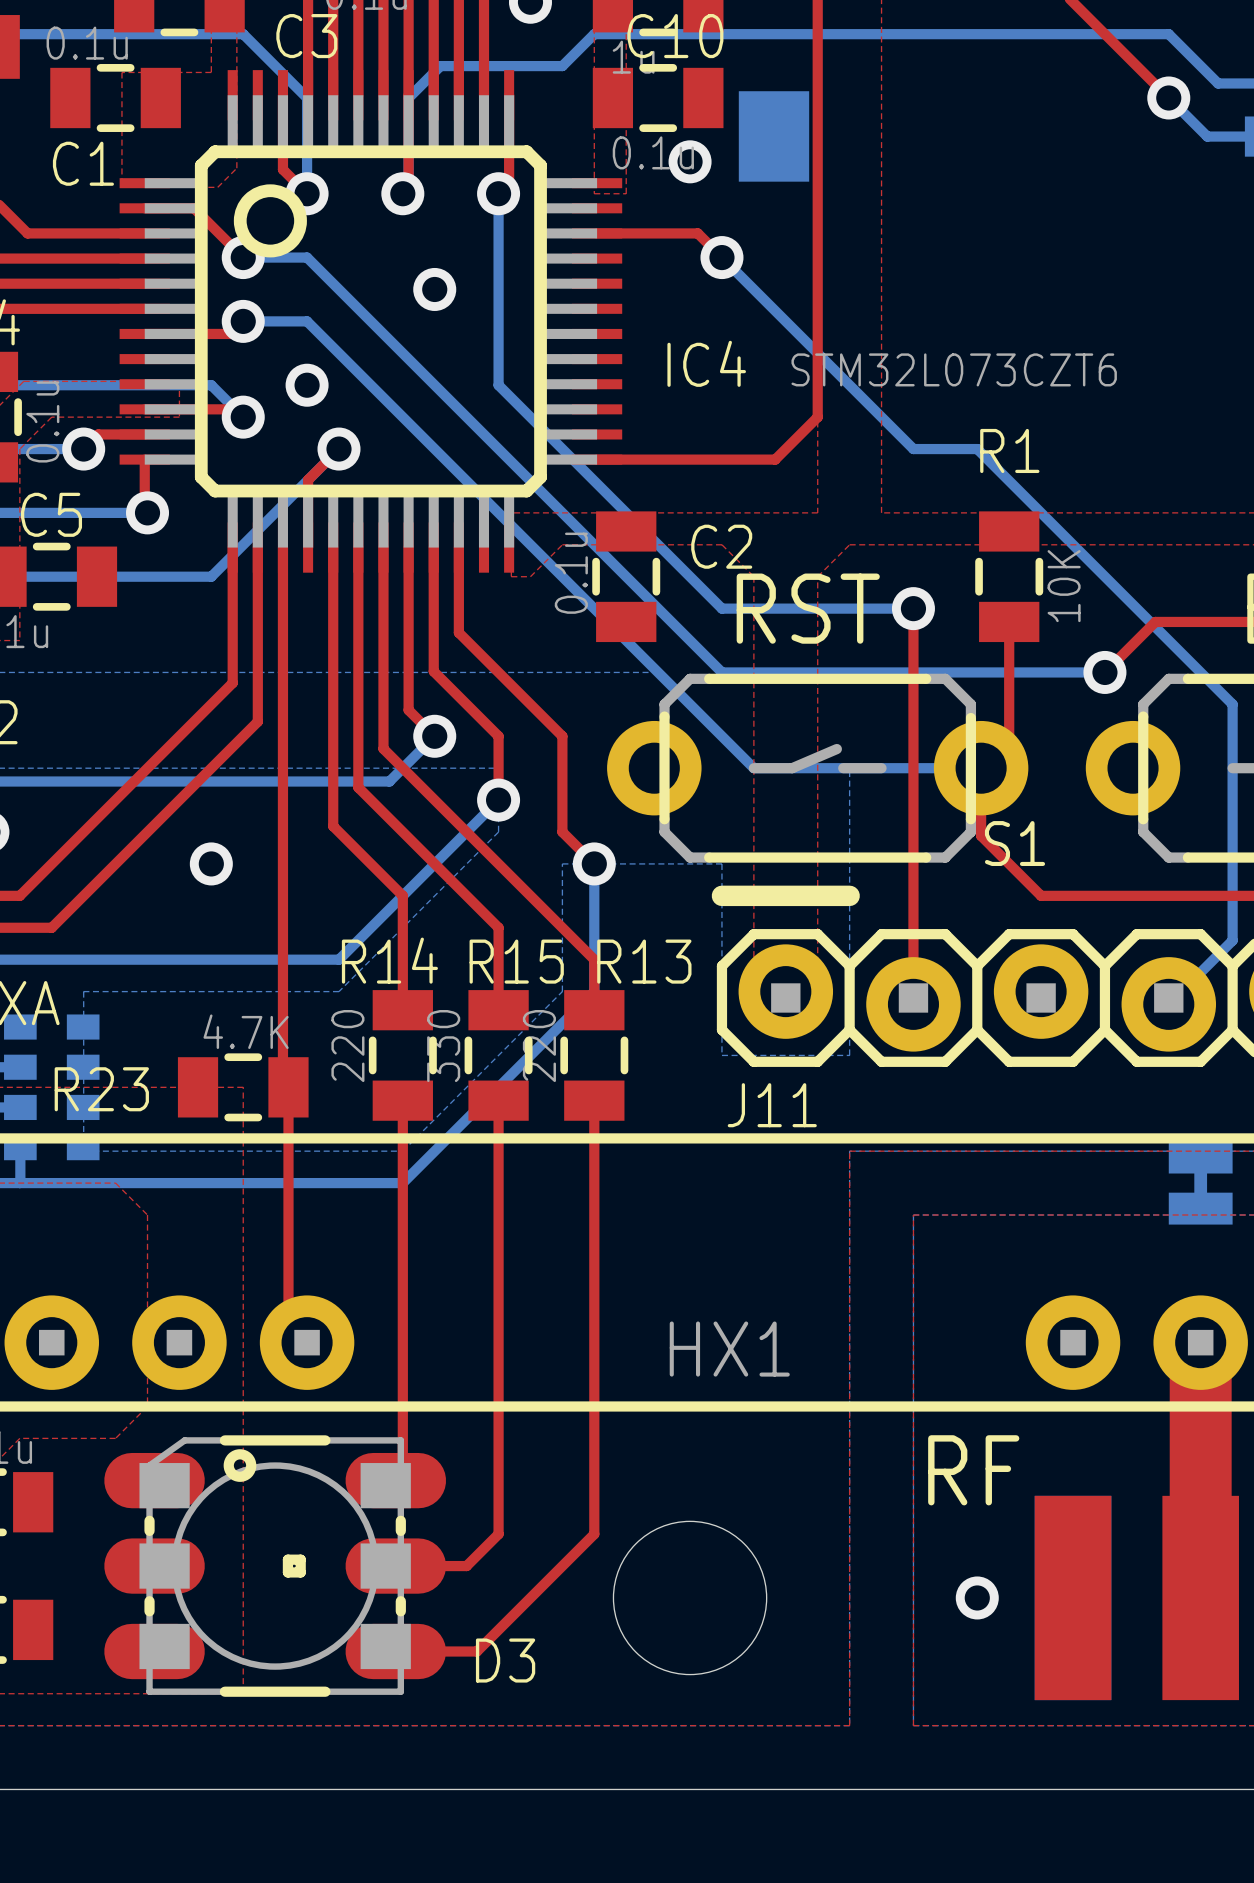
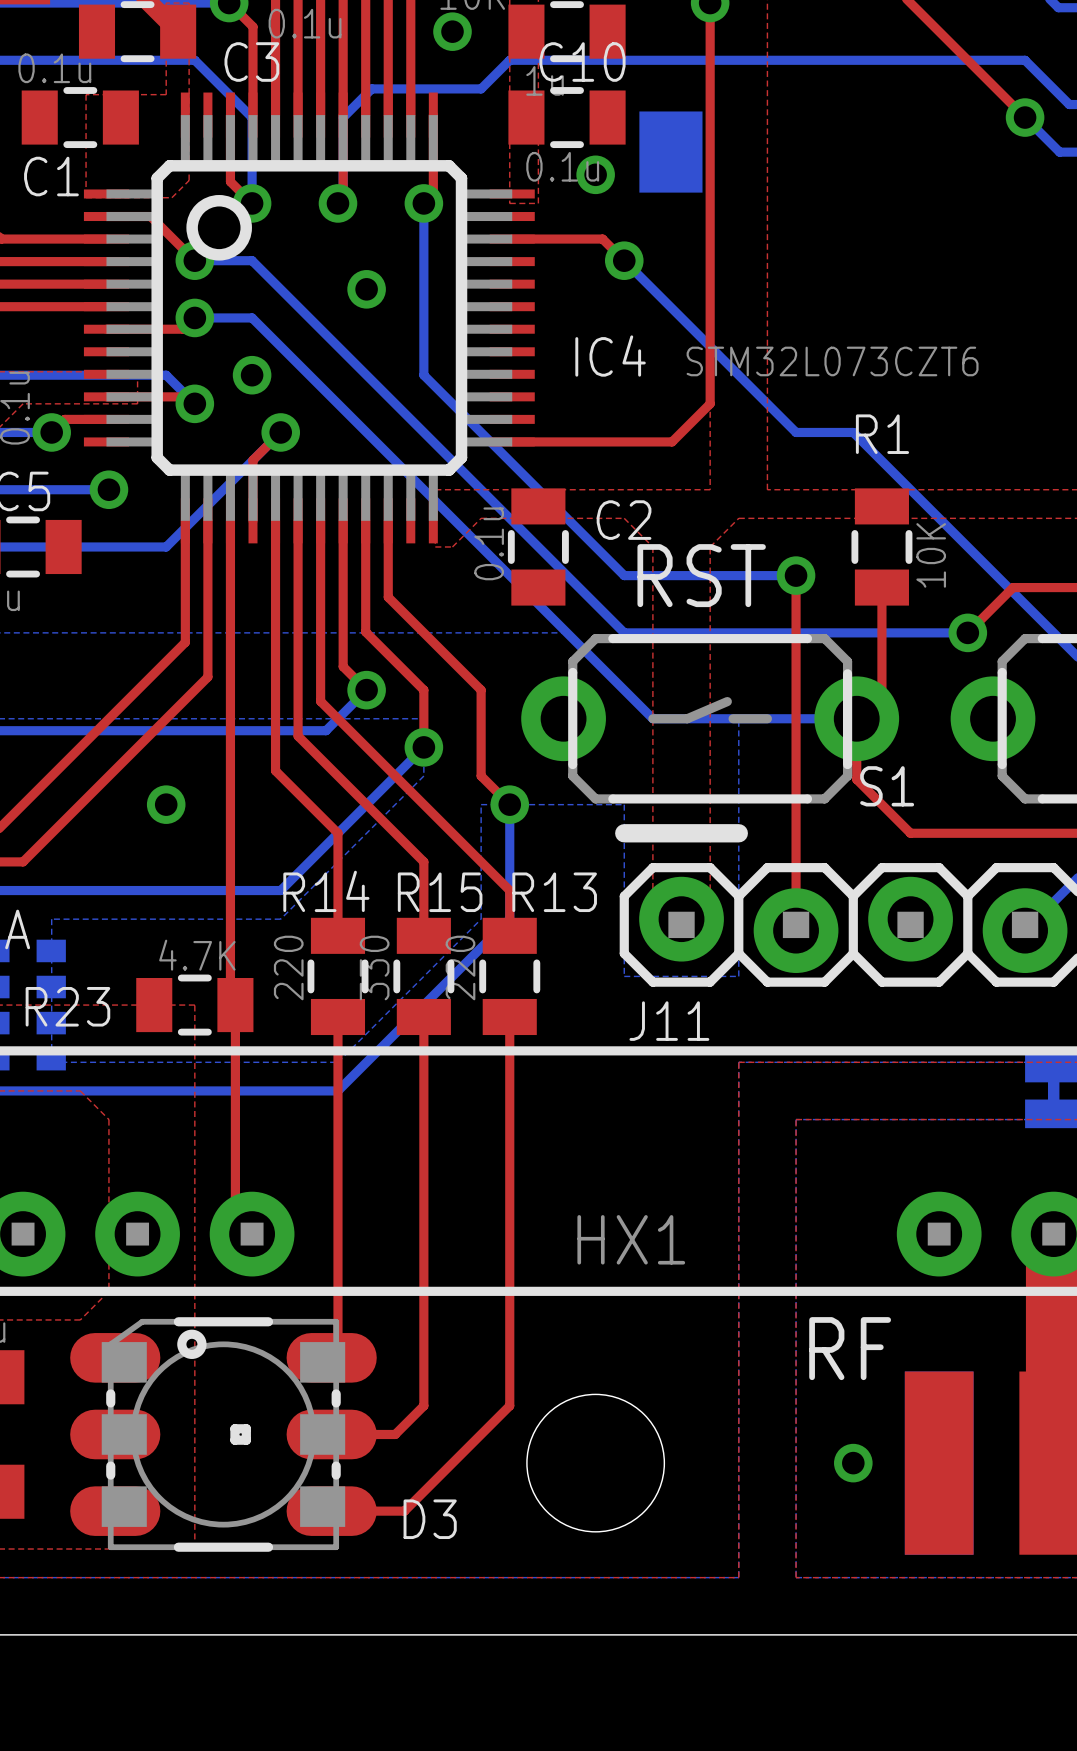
top track: (144, 459) (144, 510) -> none

